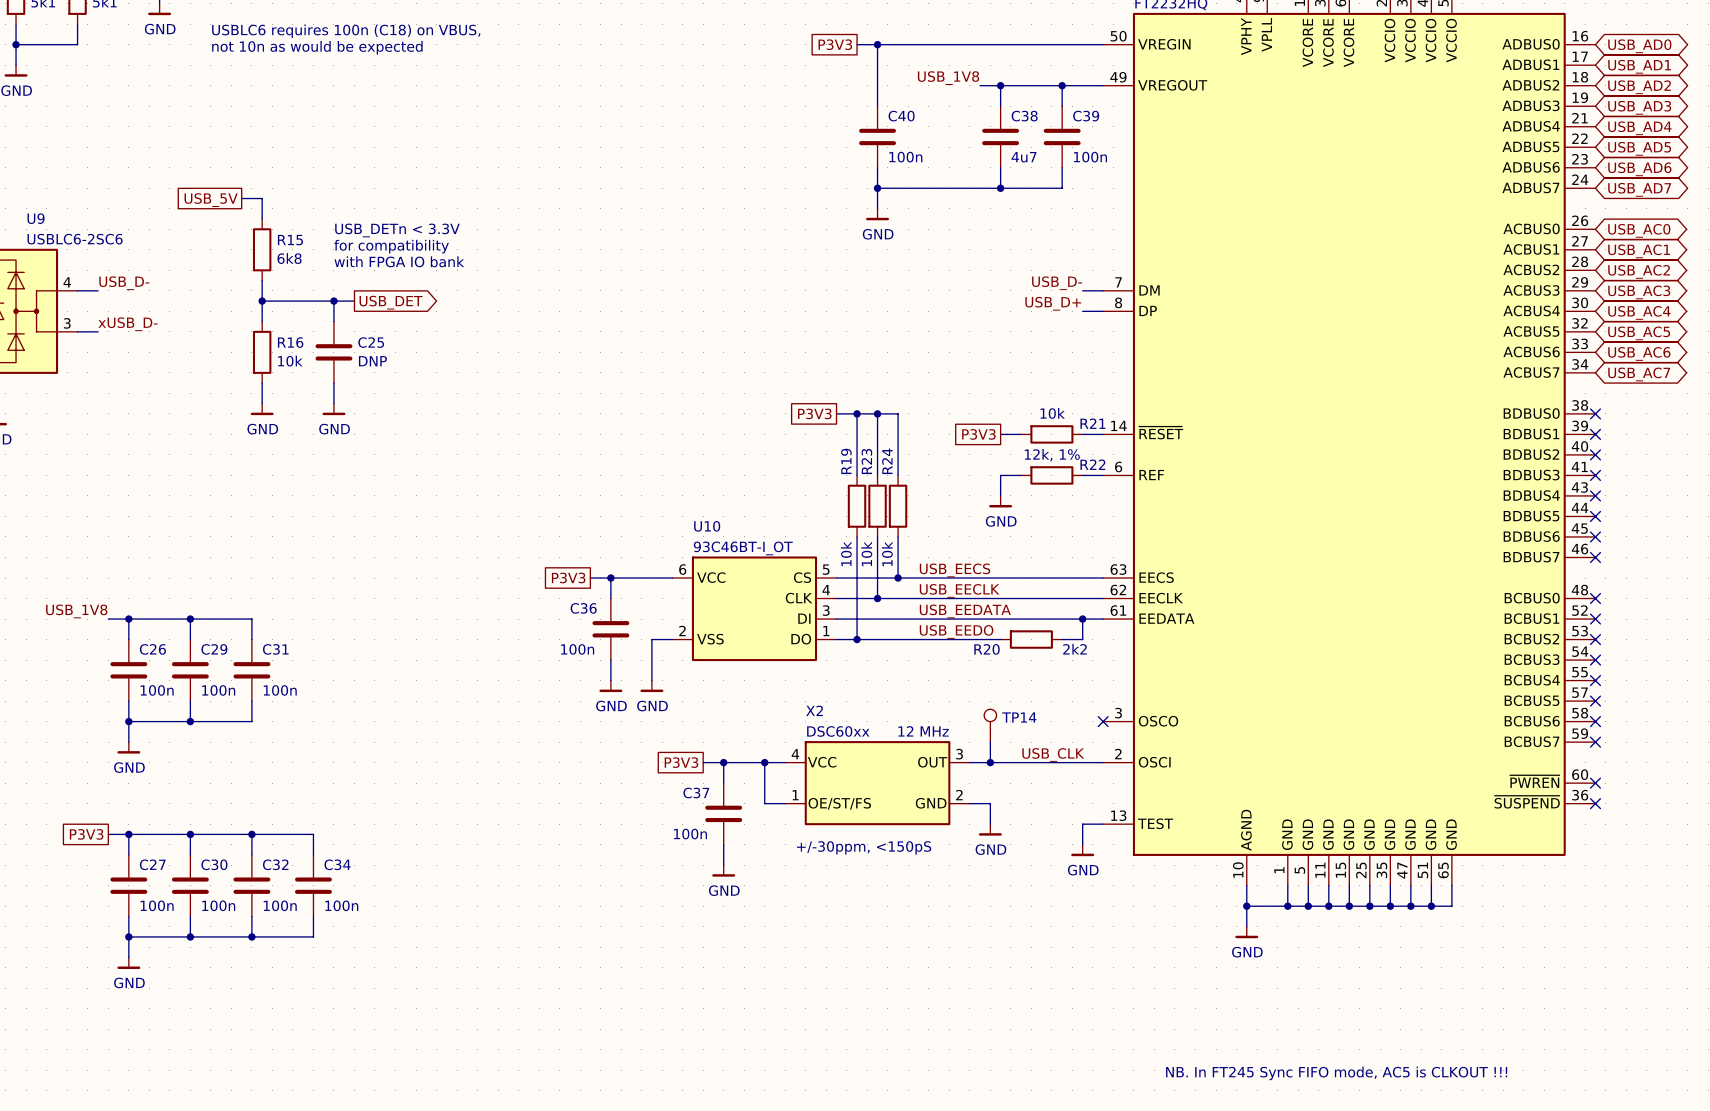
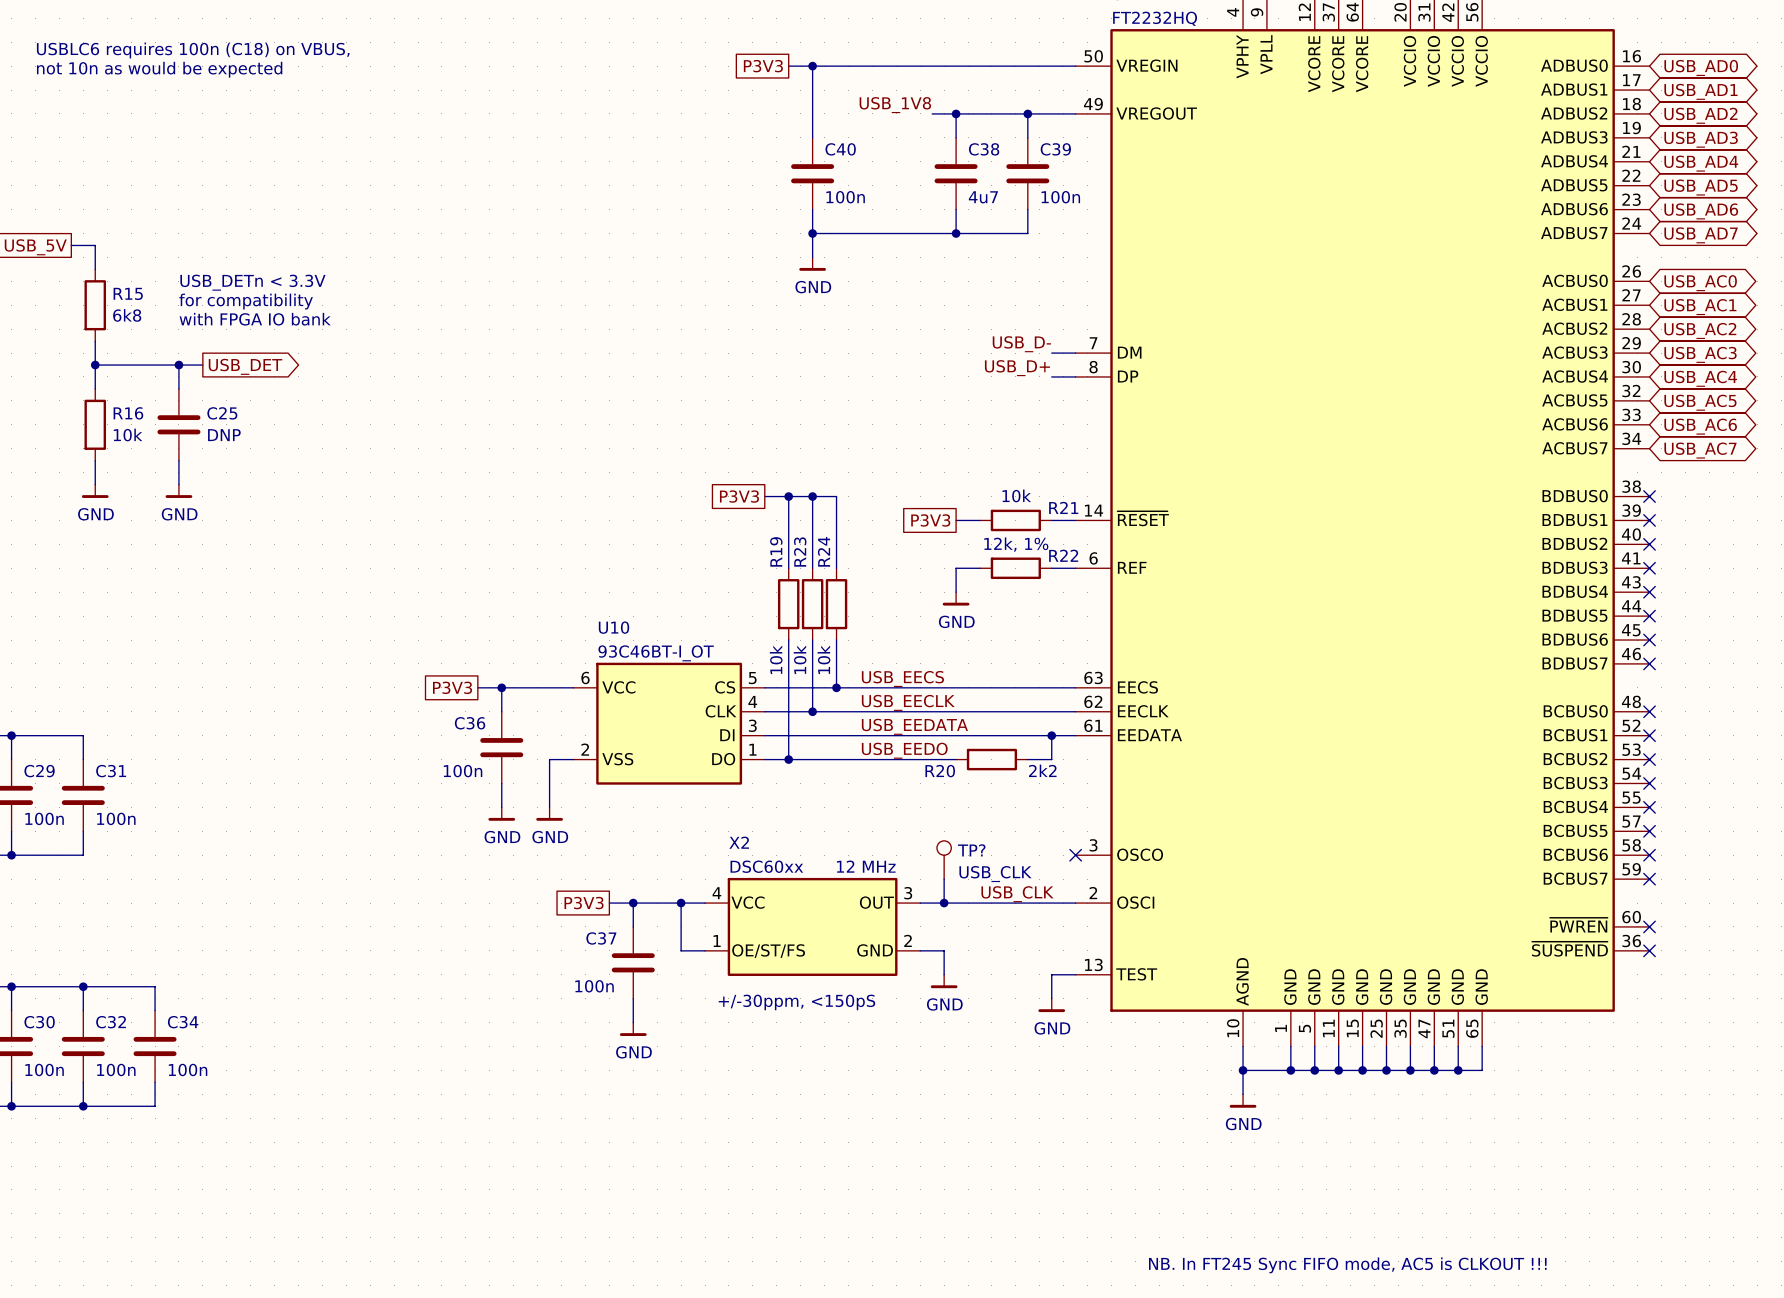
TP14 name: TP14 (1019, 717) -> TP? (971, 850)
TP14 value: none -> USB_CLK (995, 874)

